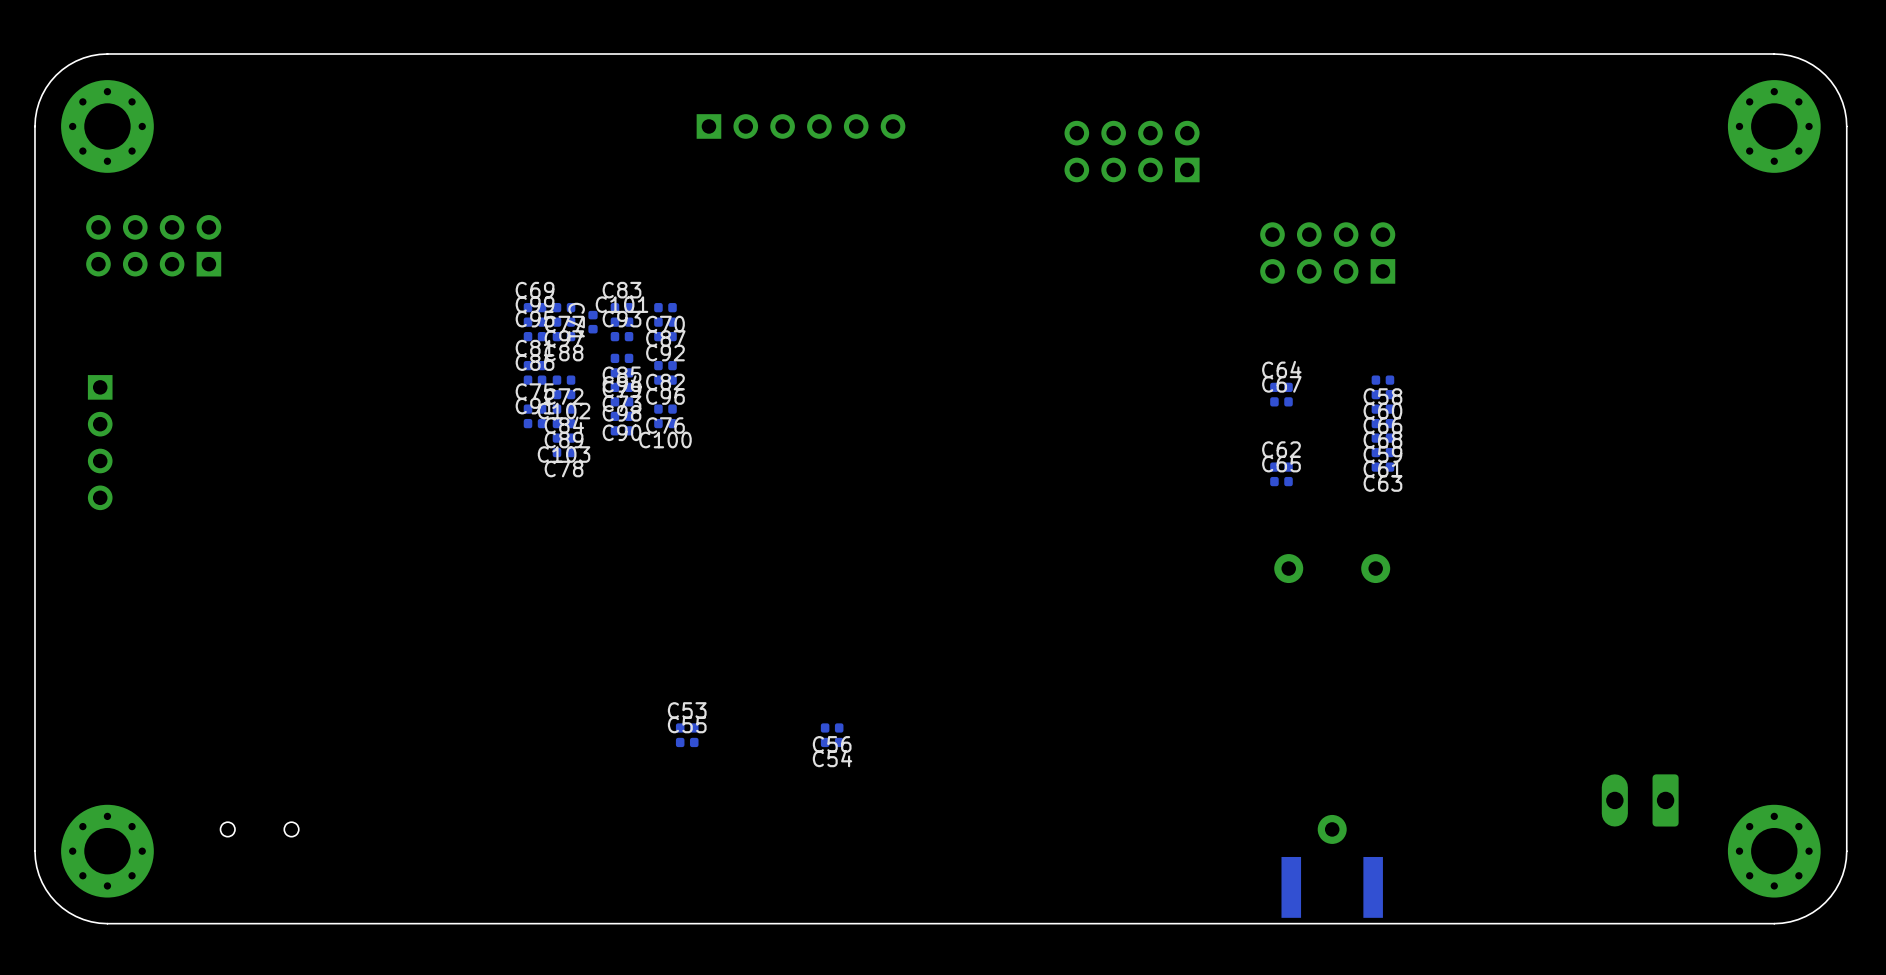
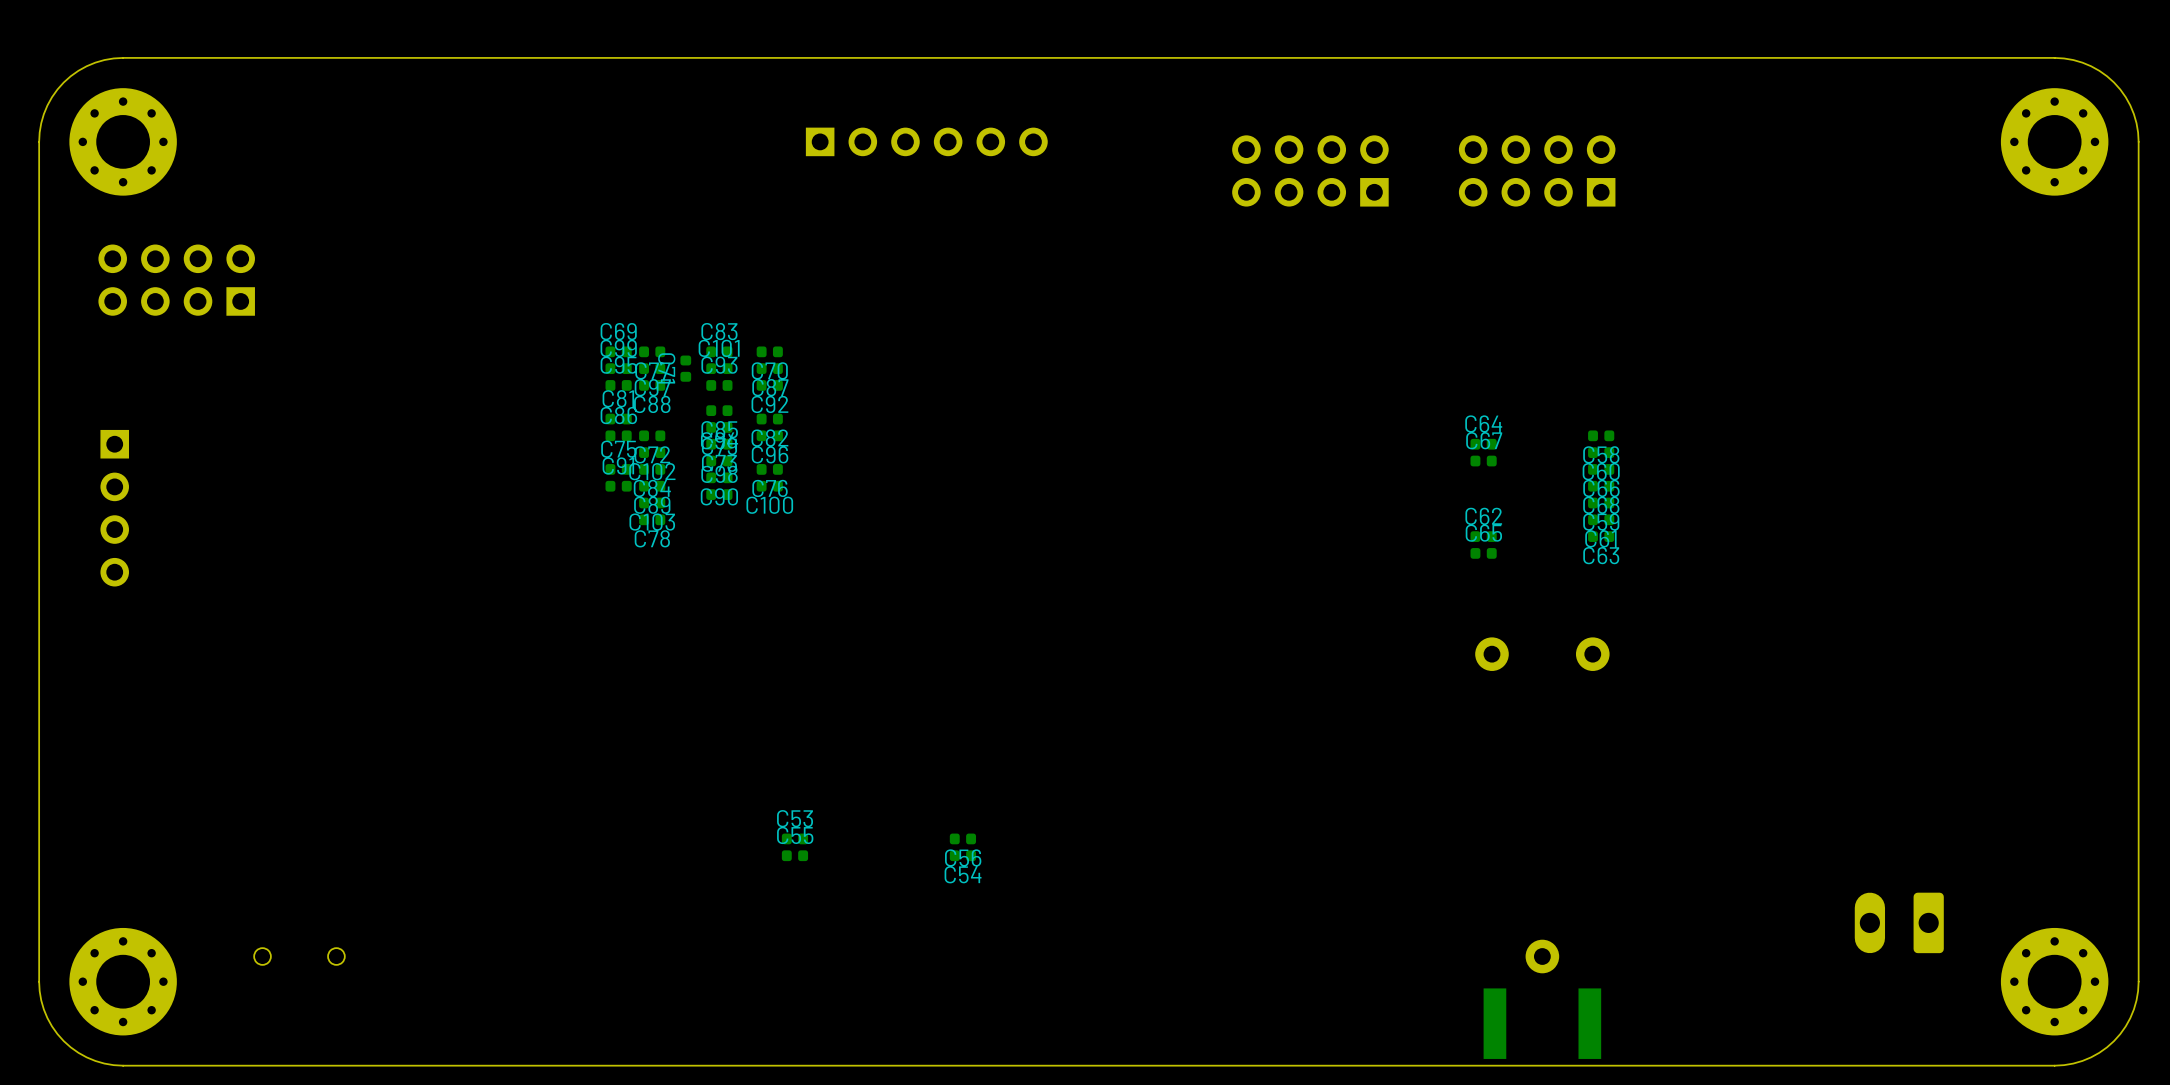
part position: (1327, 253) -> (1537, 170)

